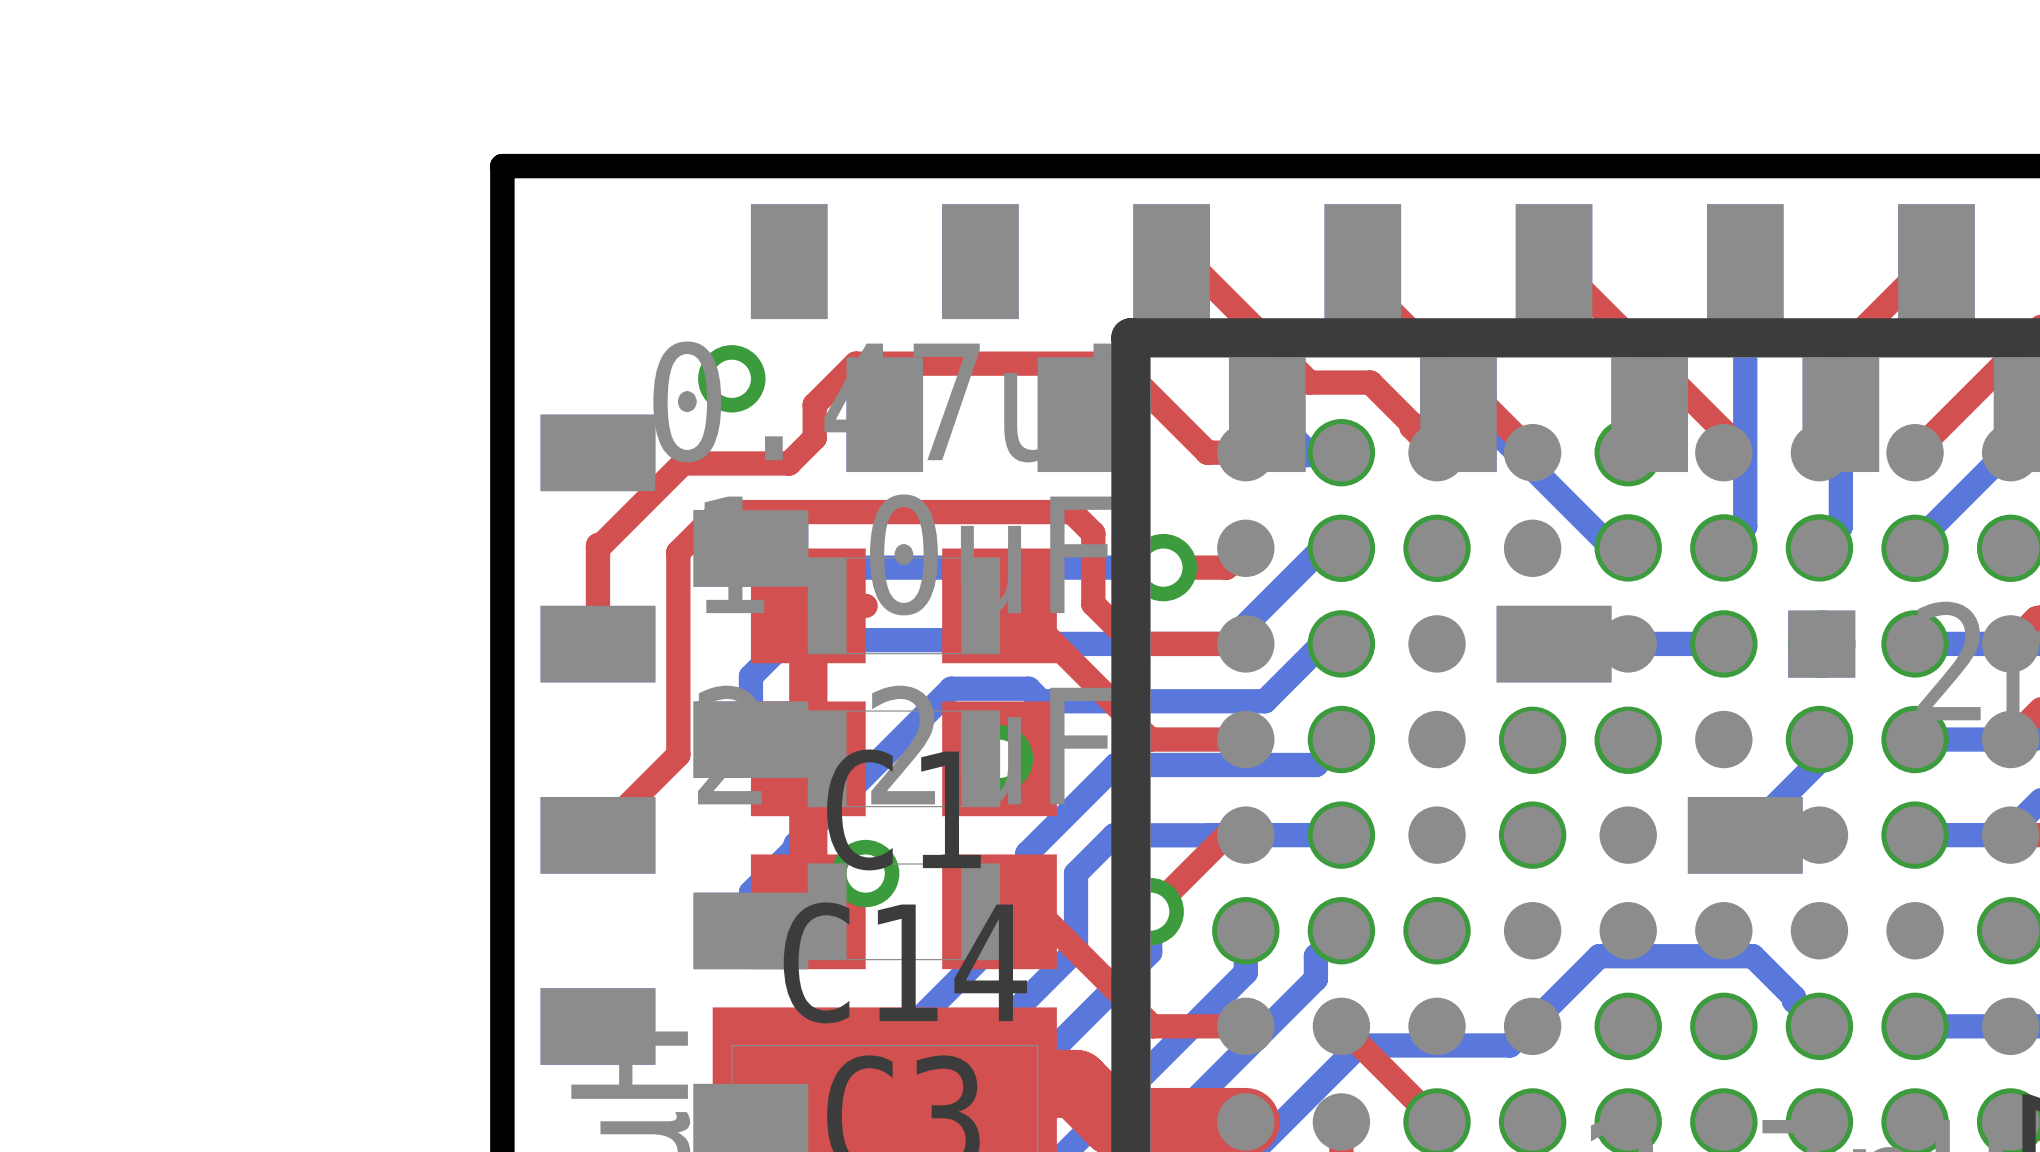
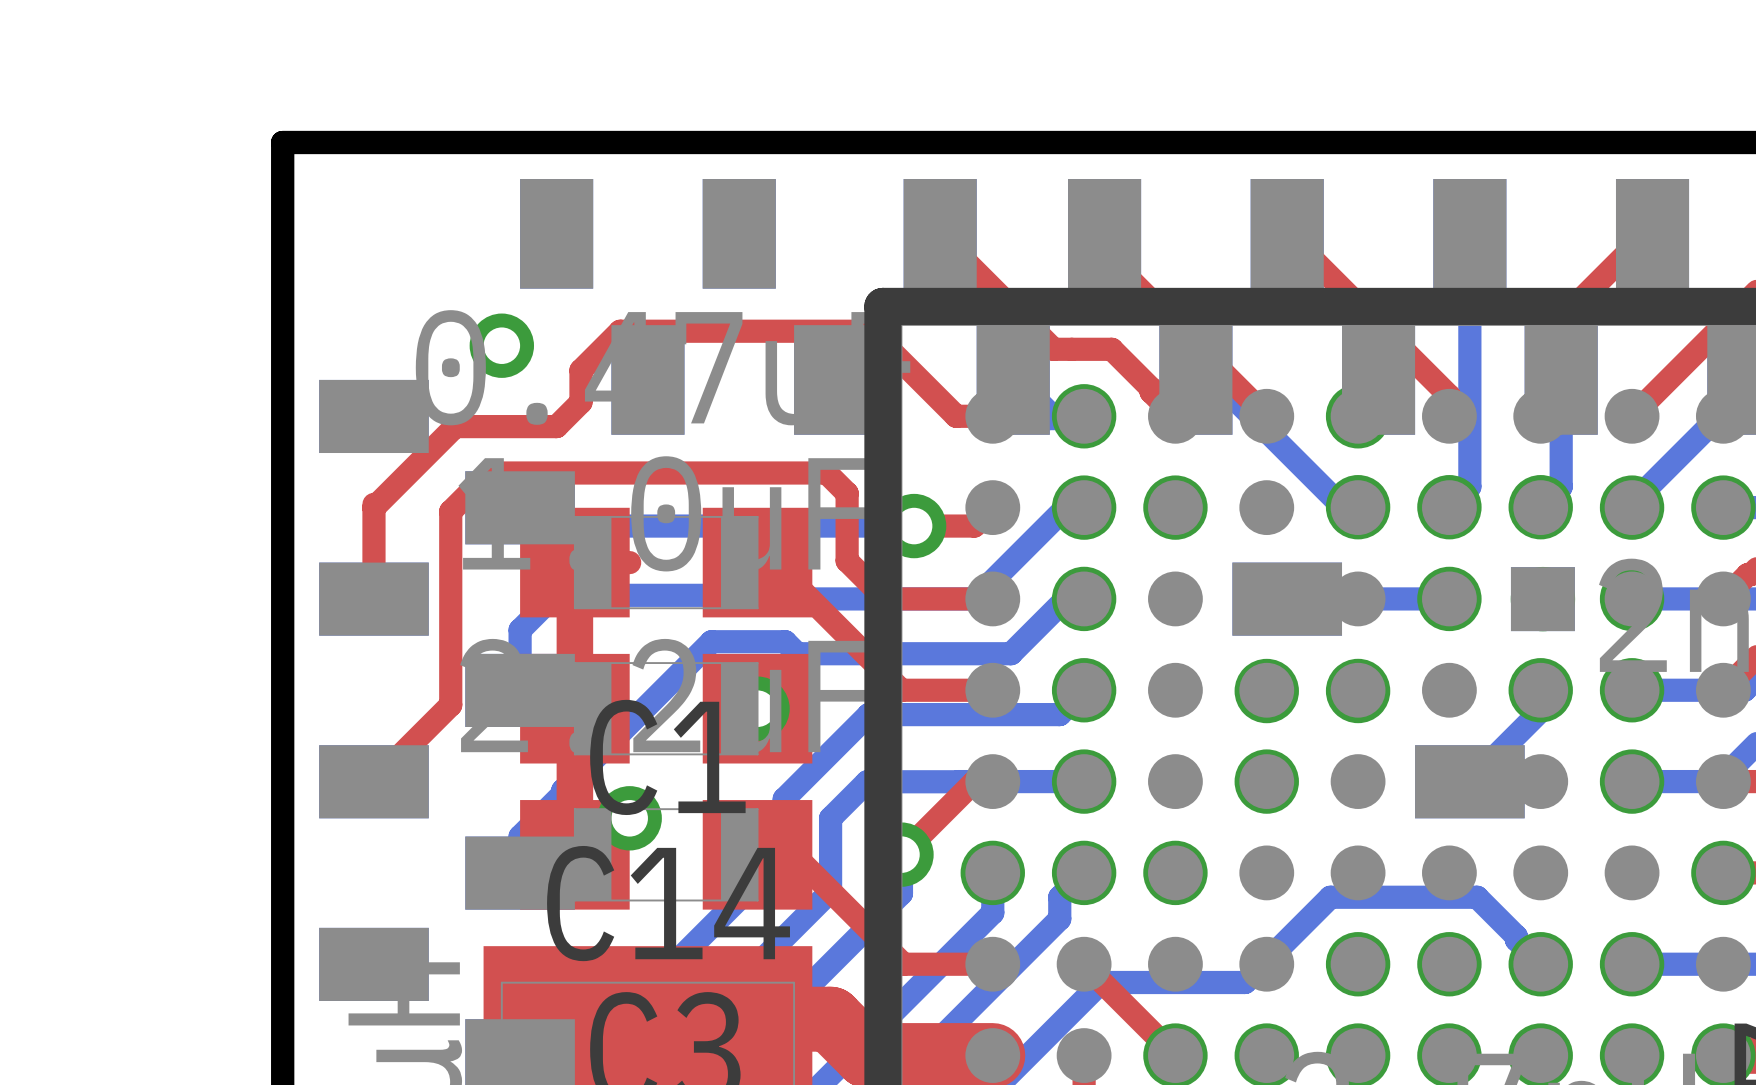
drawing position: (1171, 261) -> (940, 233)

